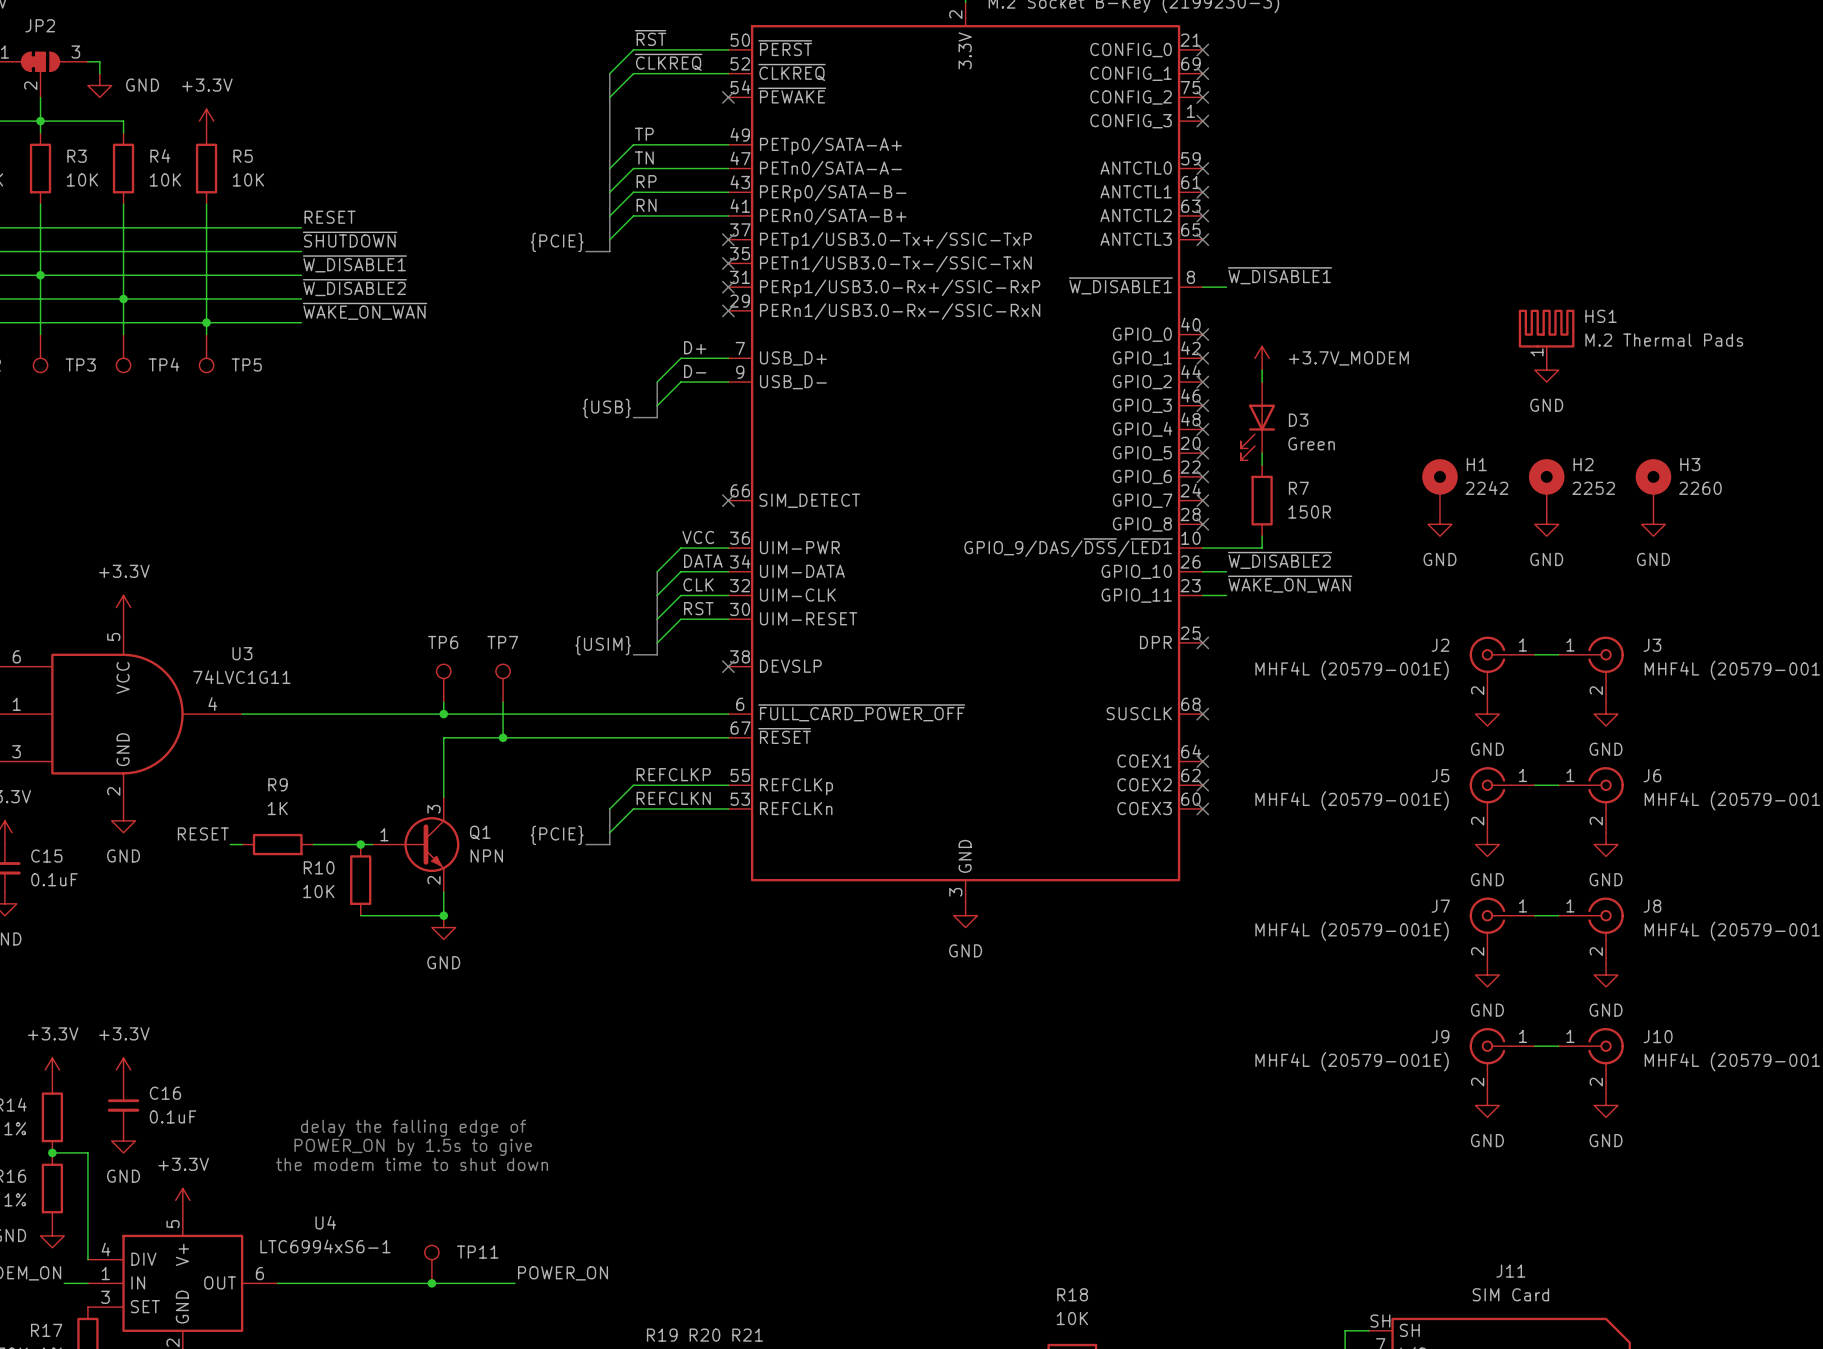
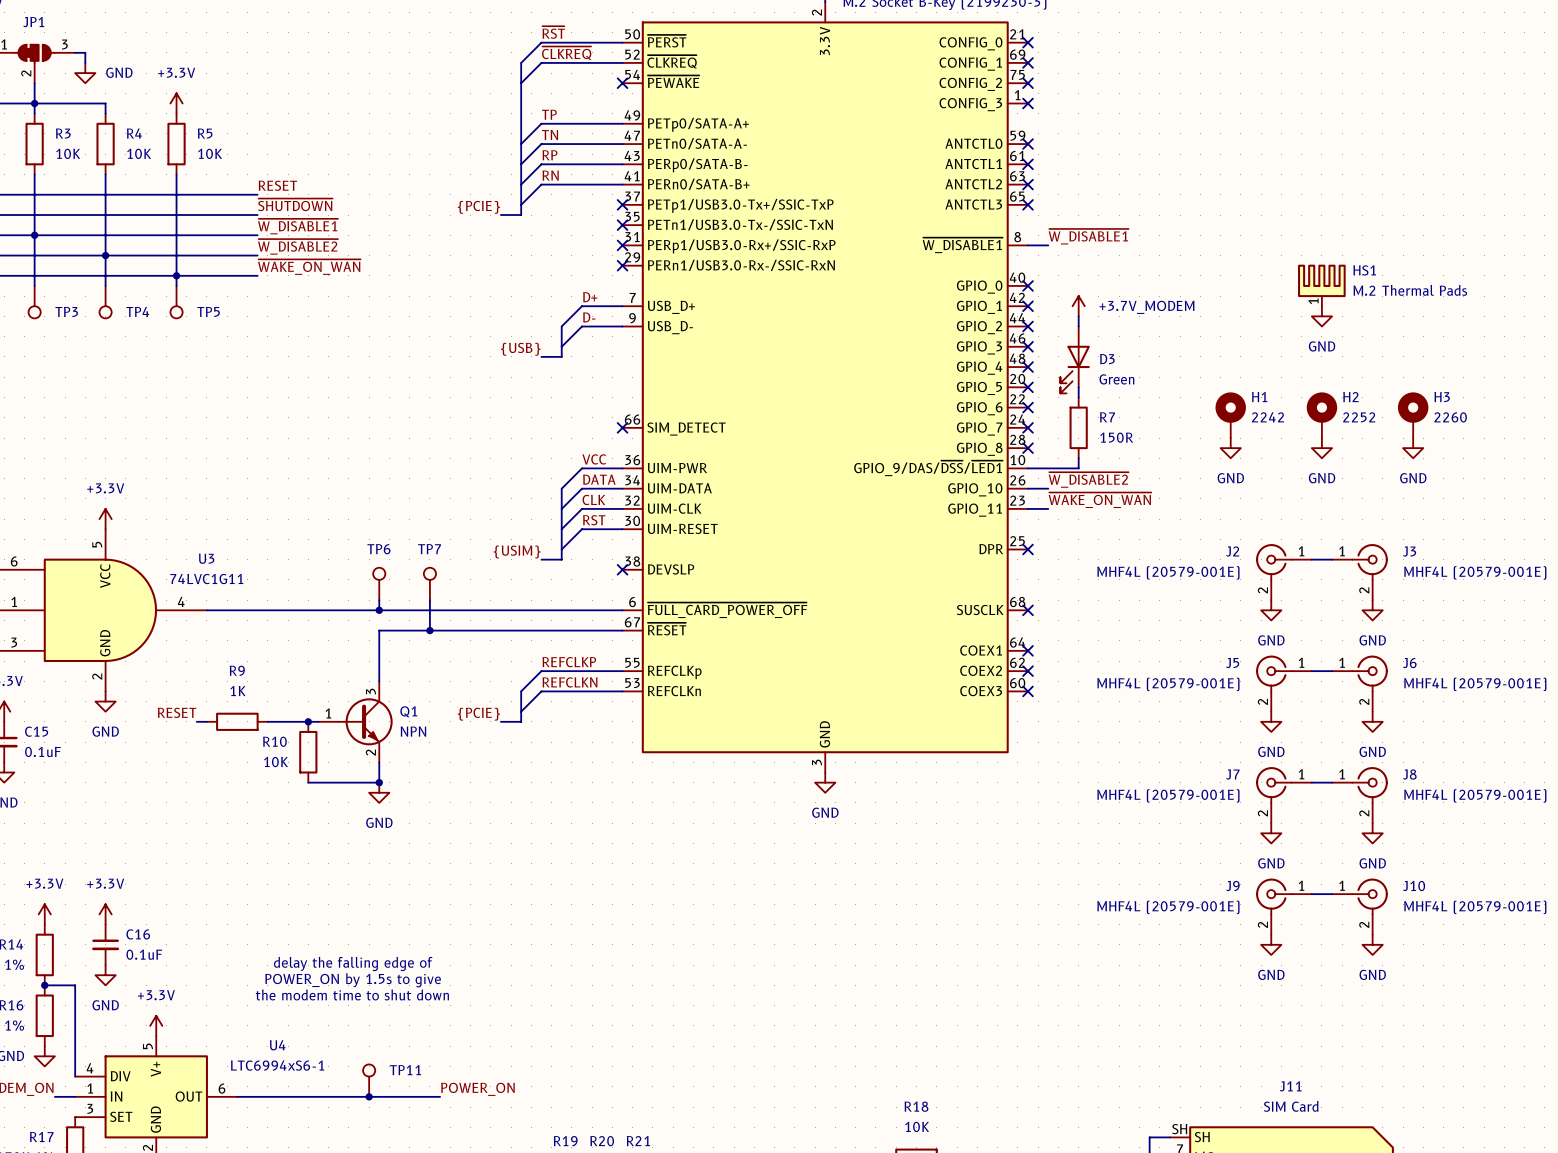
JP2 name: JP2 (40, 25) -> JP1 (33, 22)

